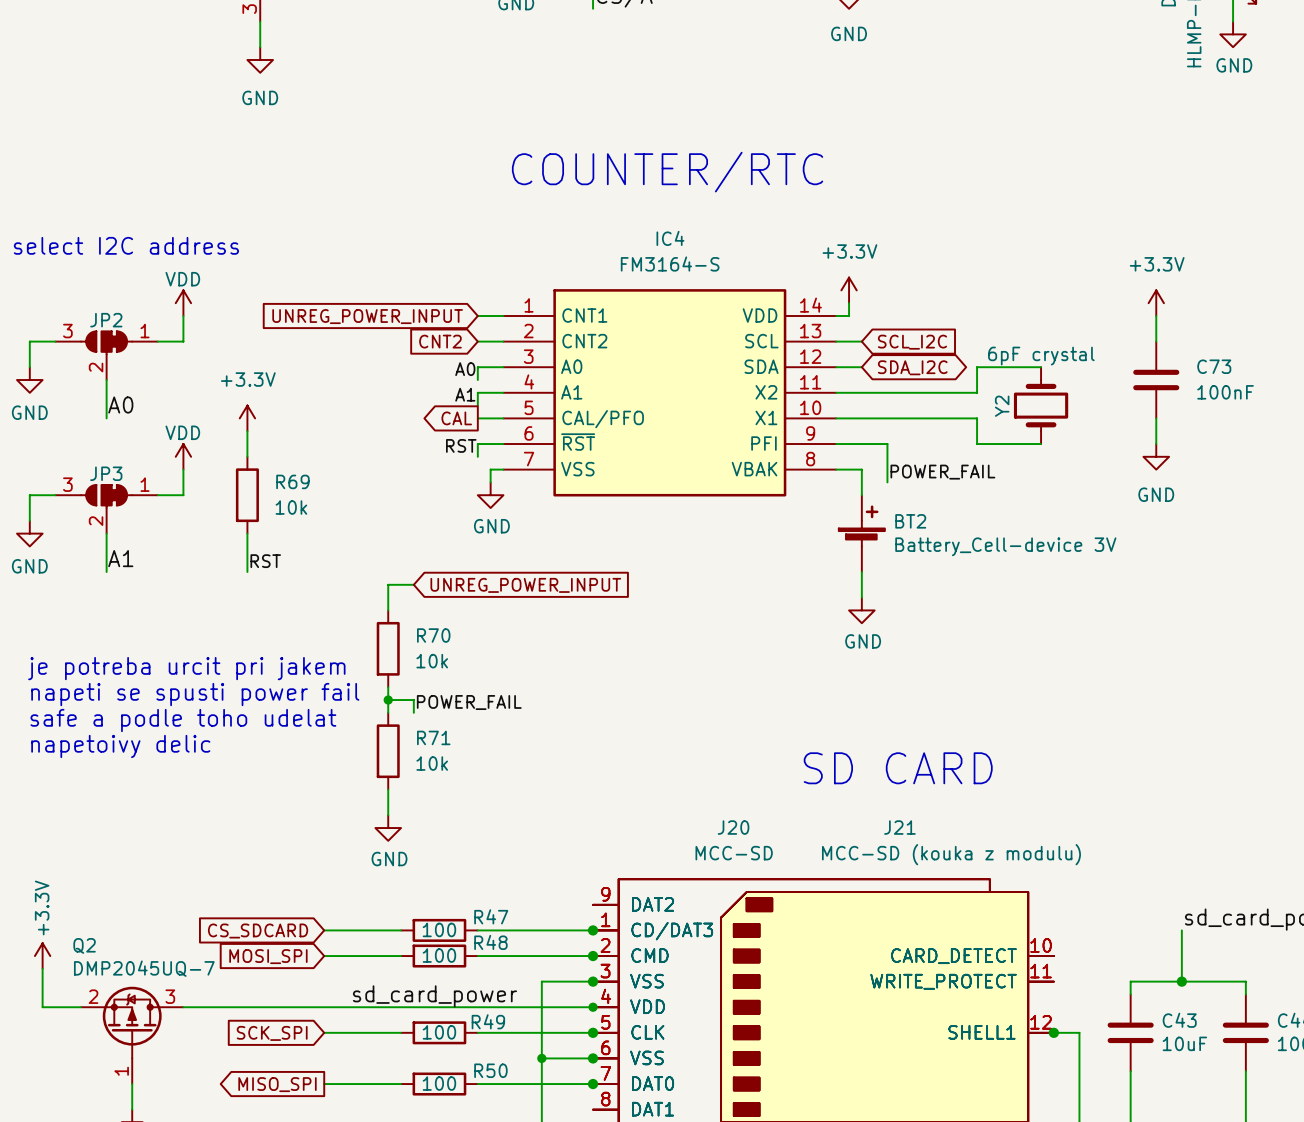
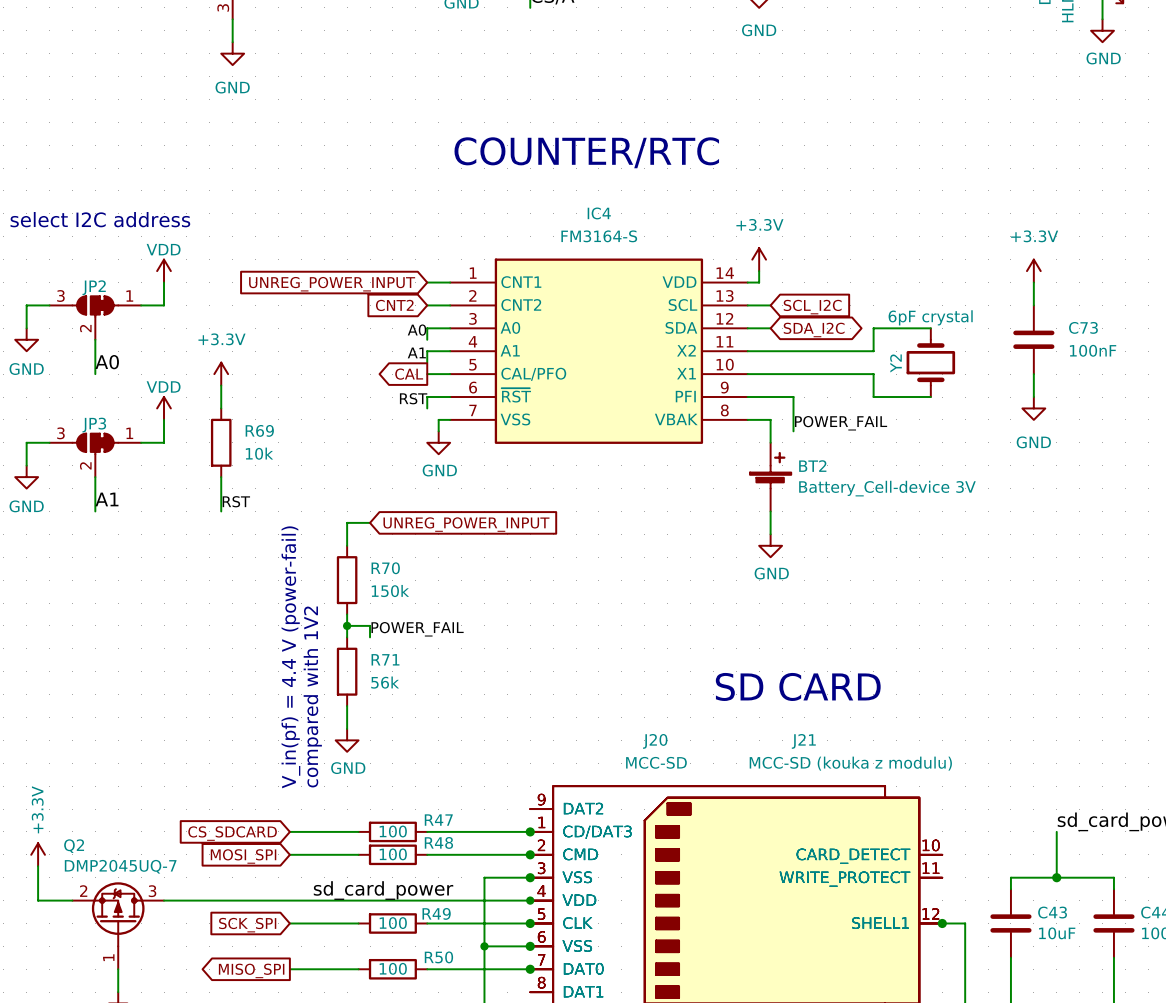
R70 value: 10k (432, 661) -> 150k (390, 591)
text: je potreba urcit pri jakem (186, 668) -> none
text: napeti se spusti power fail (195, 694) -> none
text: none -> V_in(pf) = 4.4 V (power-fail) (290, 657)
text: safe a podle toho udelat (183, 720) -> none
text: napetoivy delic (120, 746) -> none
R71 value: 10k (432, 763) -> 56k (385, 682)
text: none -> compared with 1V2 (312, 696)

